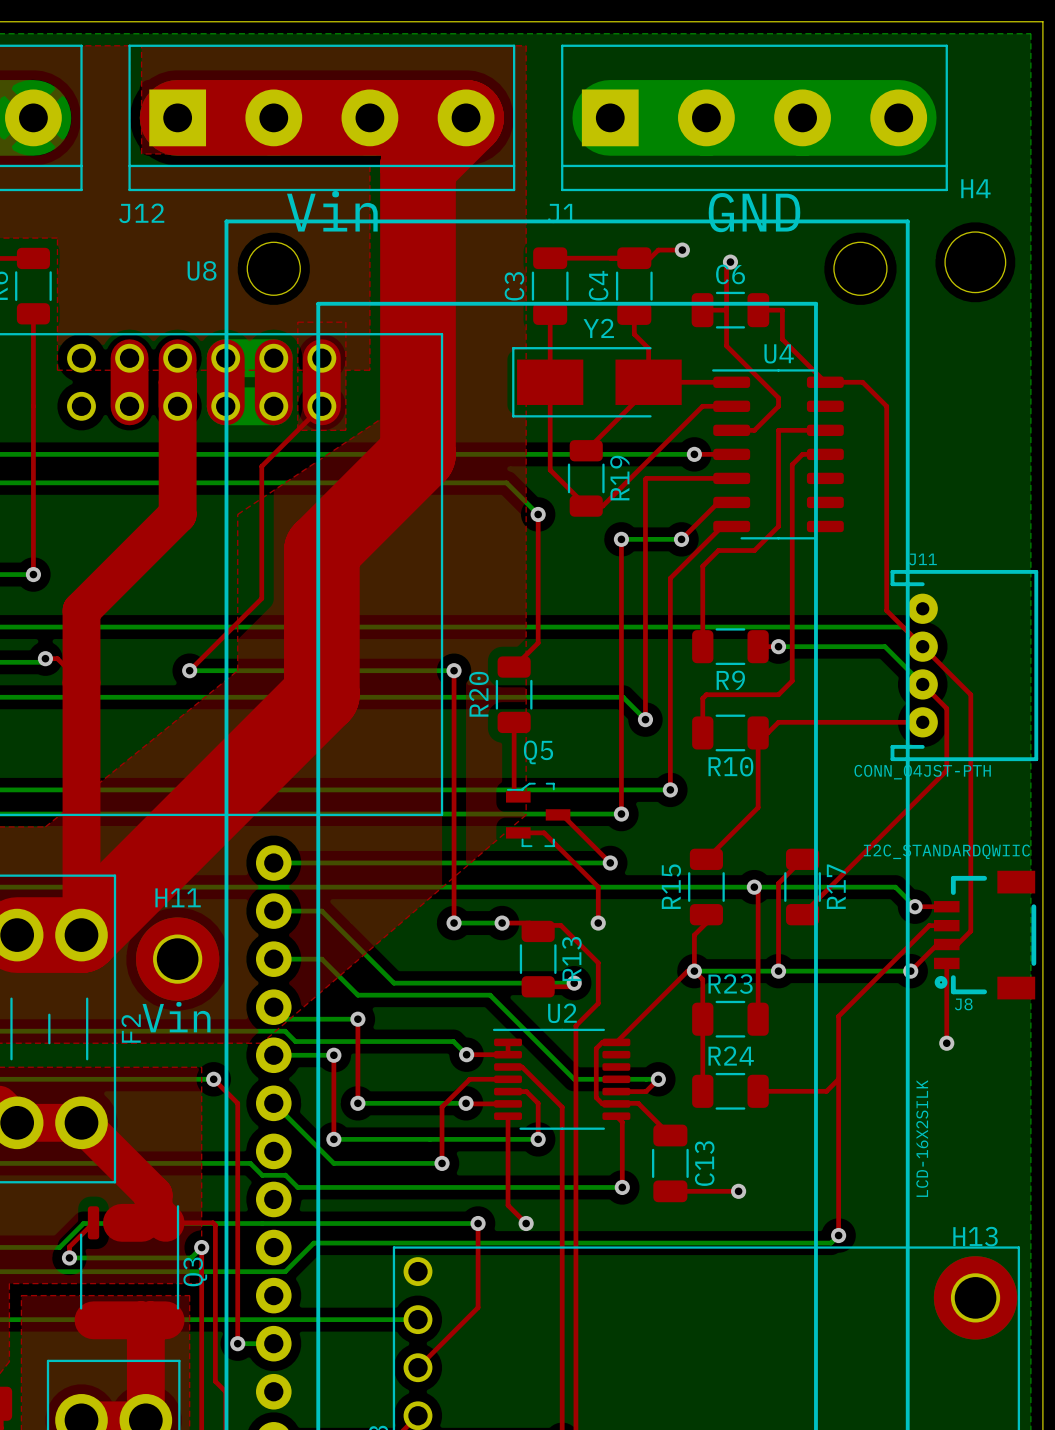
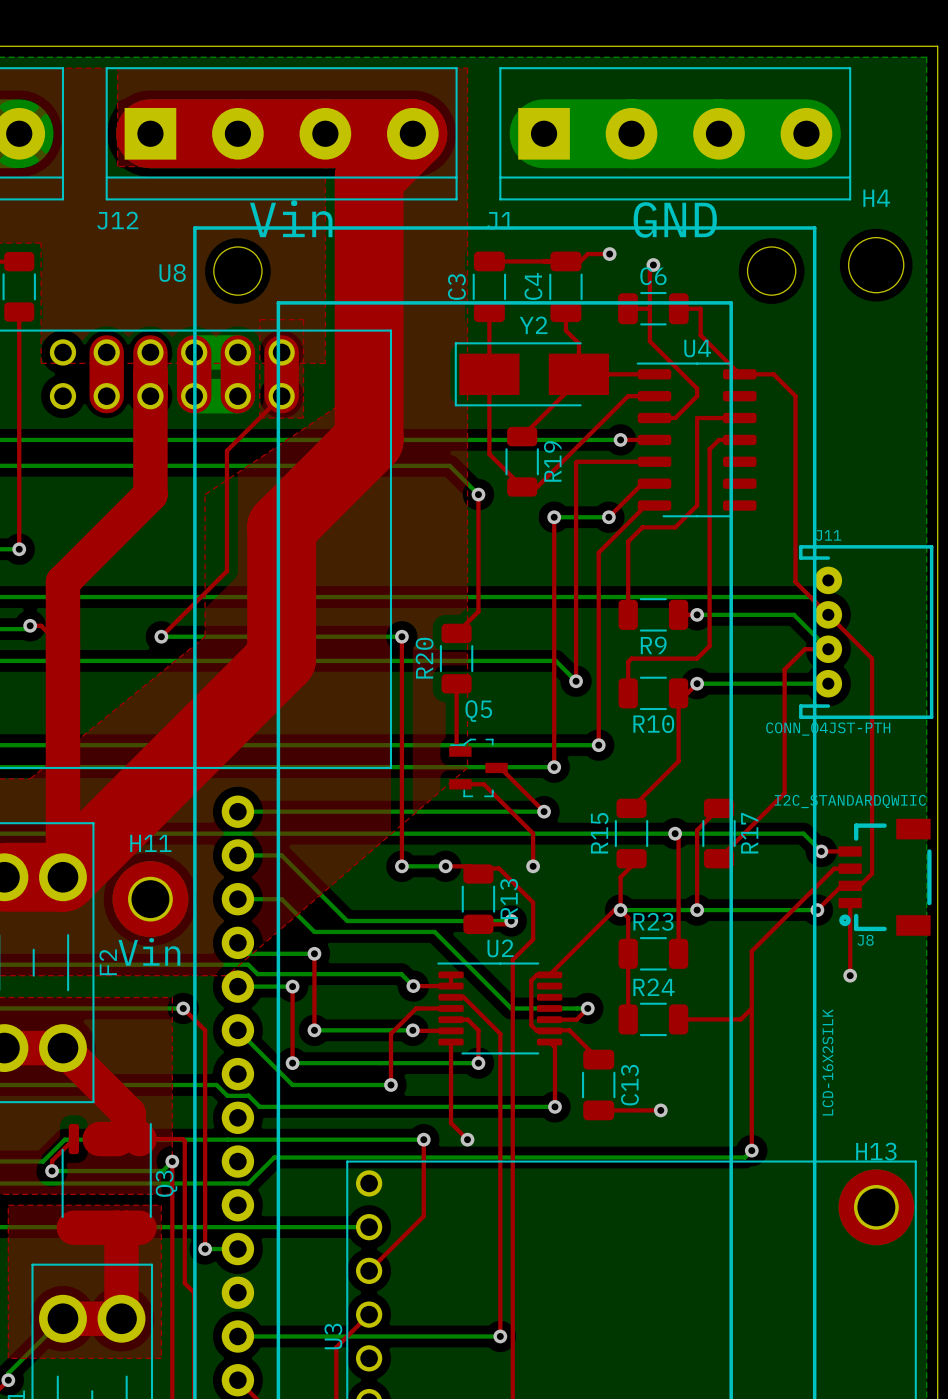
top track: (922, 684) (946, 708) (946, 770) (874, 842) -> (828, 649) (804, 649) (784, 669) (784, 793)
top track: (778, 722) (922, 722) -> none
bottom track: none -> (697, 683) (828, 683)
via: none -> (697, 683)

